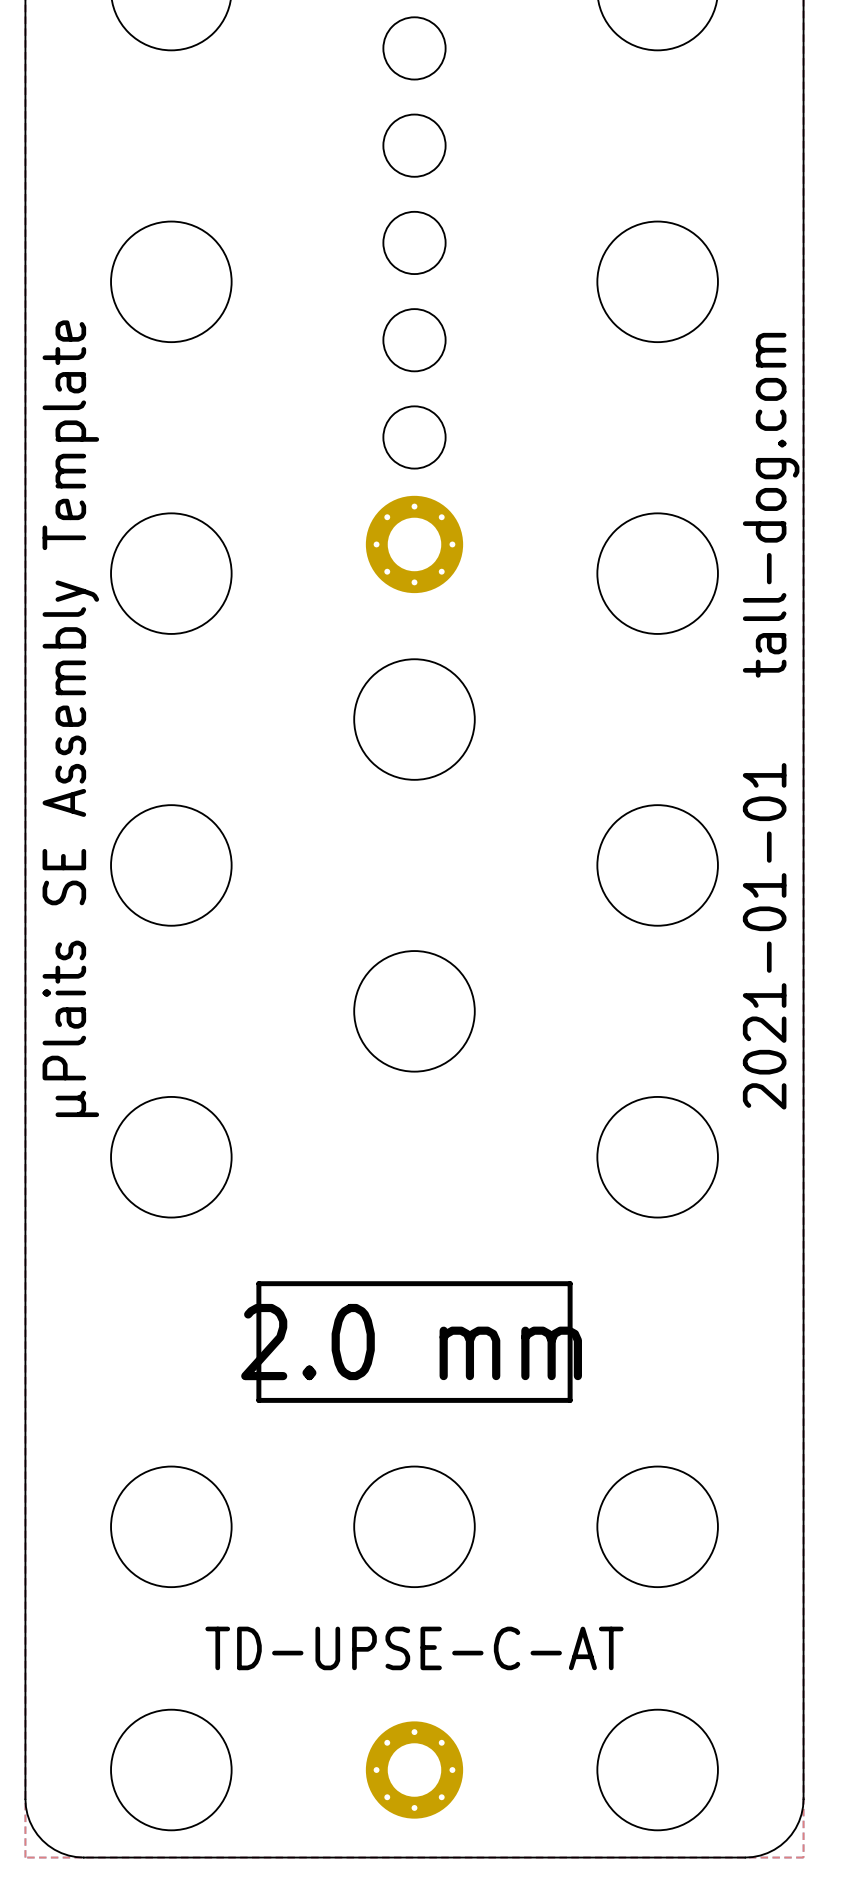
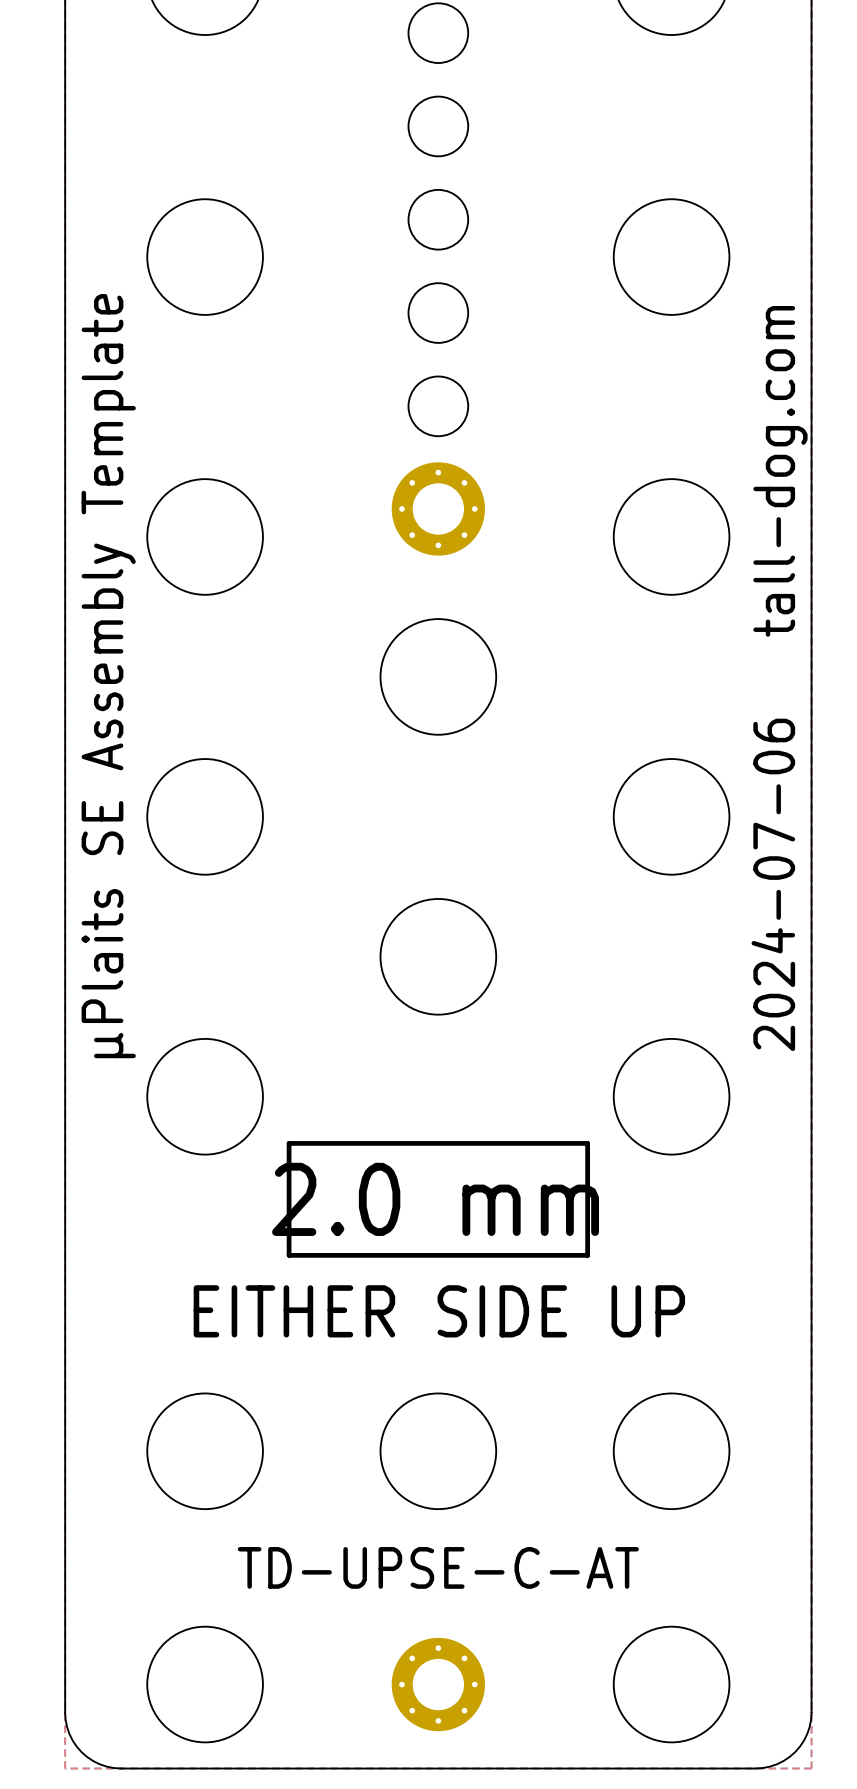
text: 2021-01-01 tall-dog.com (771, 721) -> 2024-07-06 tall-dog.com (779, 678)
line: (258, 1283) (570, 1283) -> (289, 1218) (289, 1143) (587, 1143) (587, 1218)
line: (258, 1322) (258, 1400) (570, 1400) (570, 1322) -> (289, 1255) (587, 1255)
text position: 2.0 mm (411, 1342) -> 2.0 mm (435, 1199)
text: none -> EITHER SIDE UP (439, 1311)

